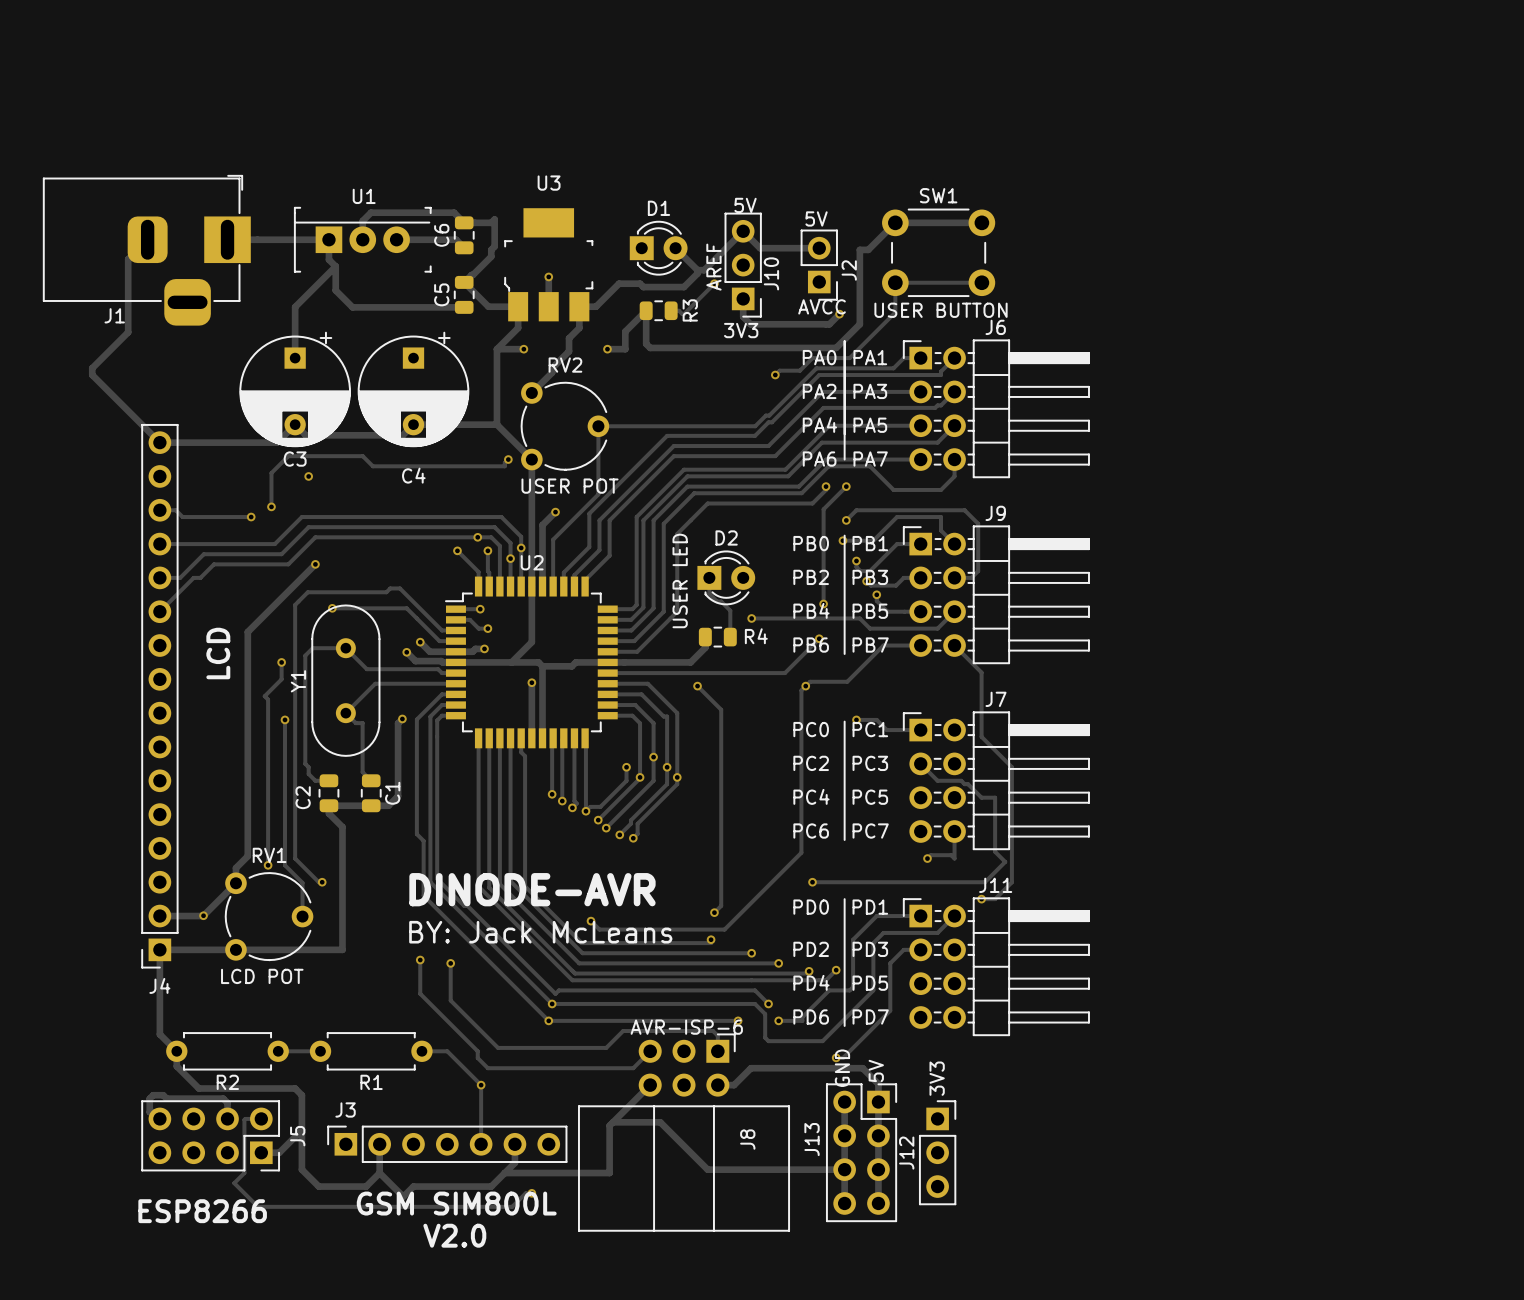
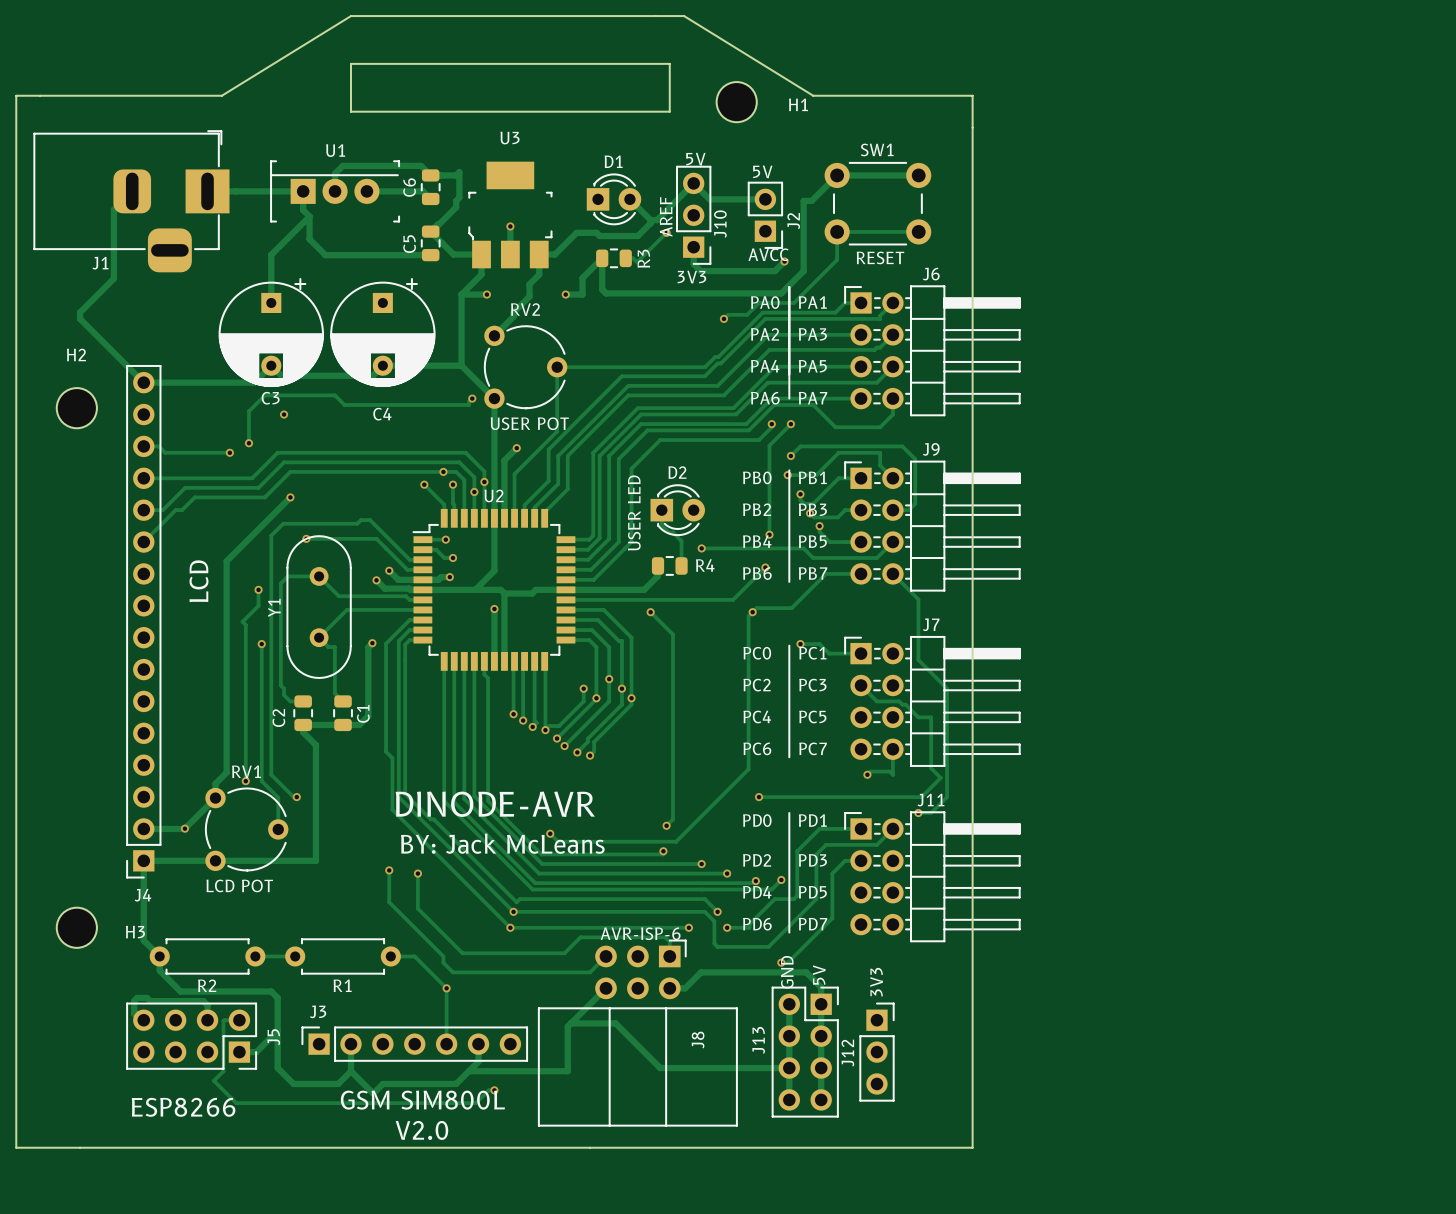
board edge: none -> (350, 16) (684, 16) (813, 95) (972, 95) (972, 1147) (16, 1147) (16, 95) (221, 95) (350, 16)
board edge: none -> (350, 63) (669, 63) (669, 111) (350, 111) (350, 63)
H1: none -> (736, 102)
text: USER BUTTON (941, 310) -> RESET (880, 257)
H2: none -> (76, 408)
H3: none -> (76, 927)

